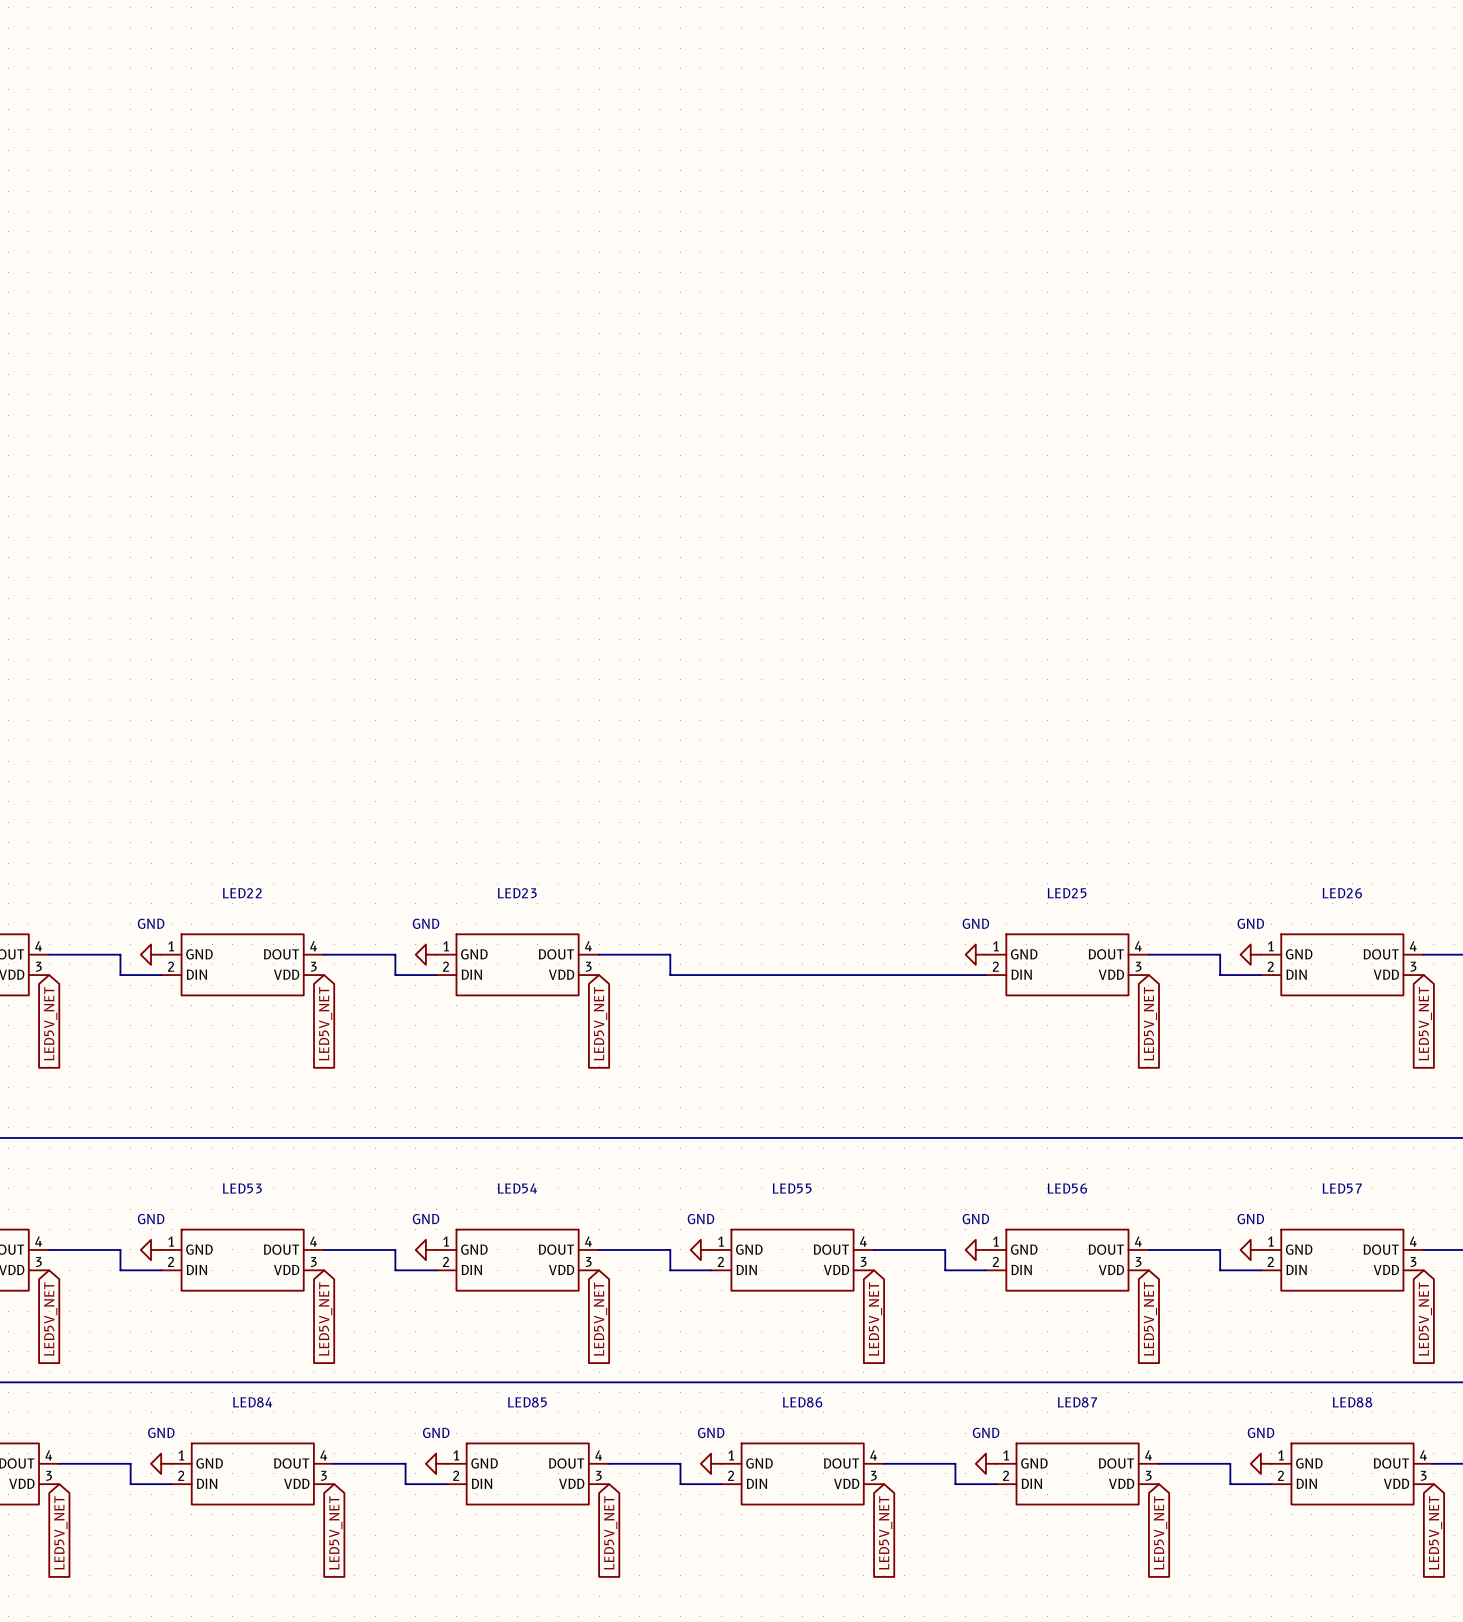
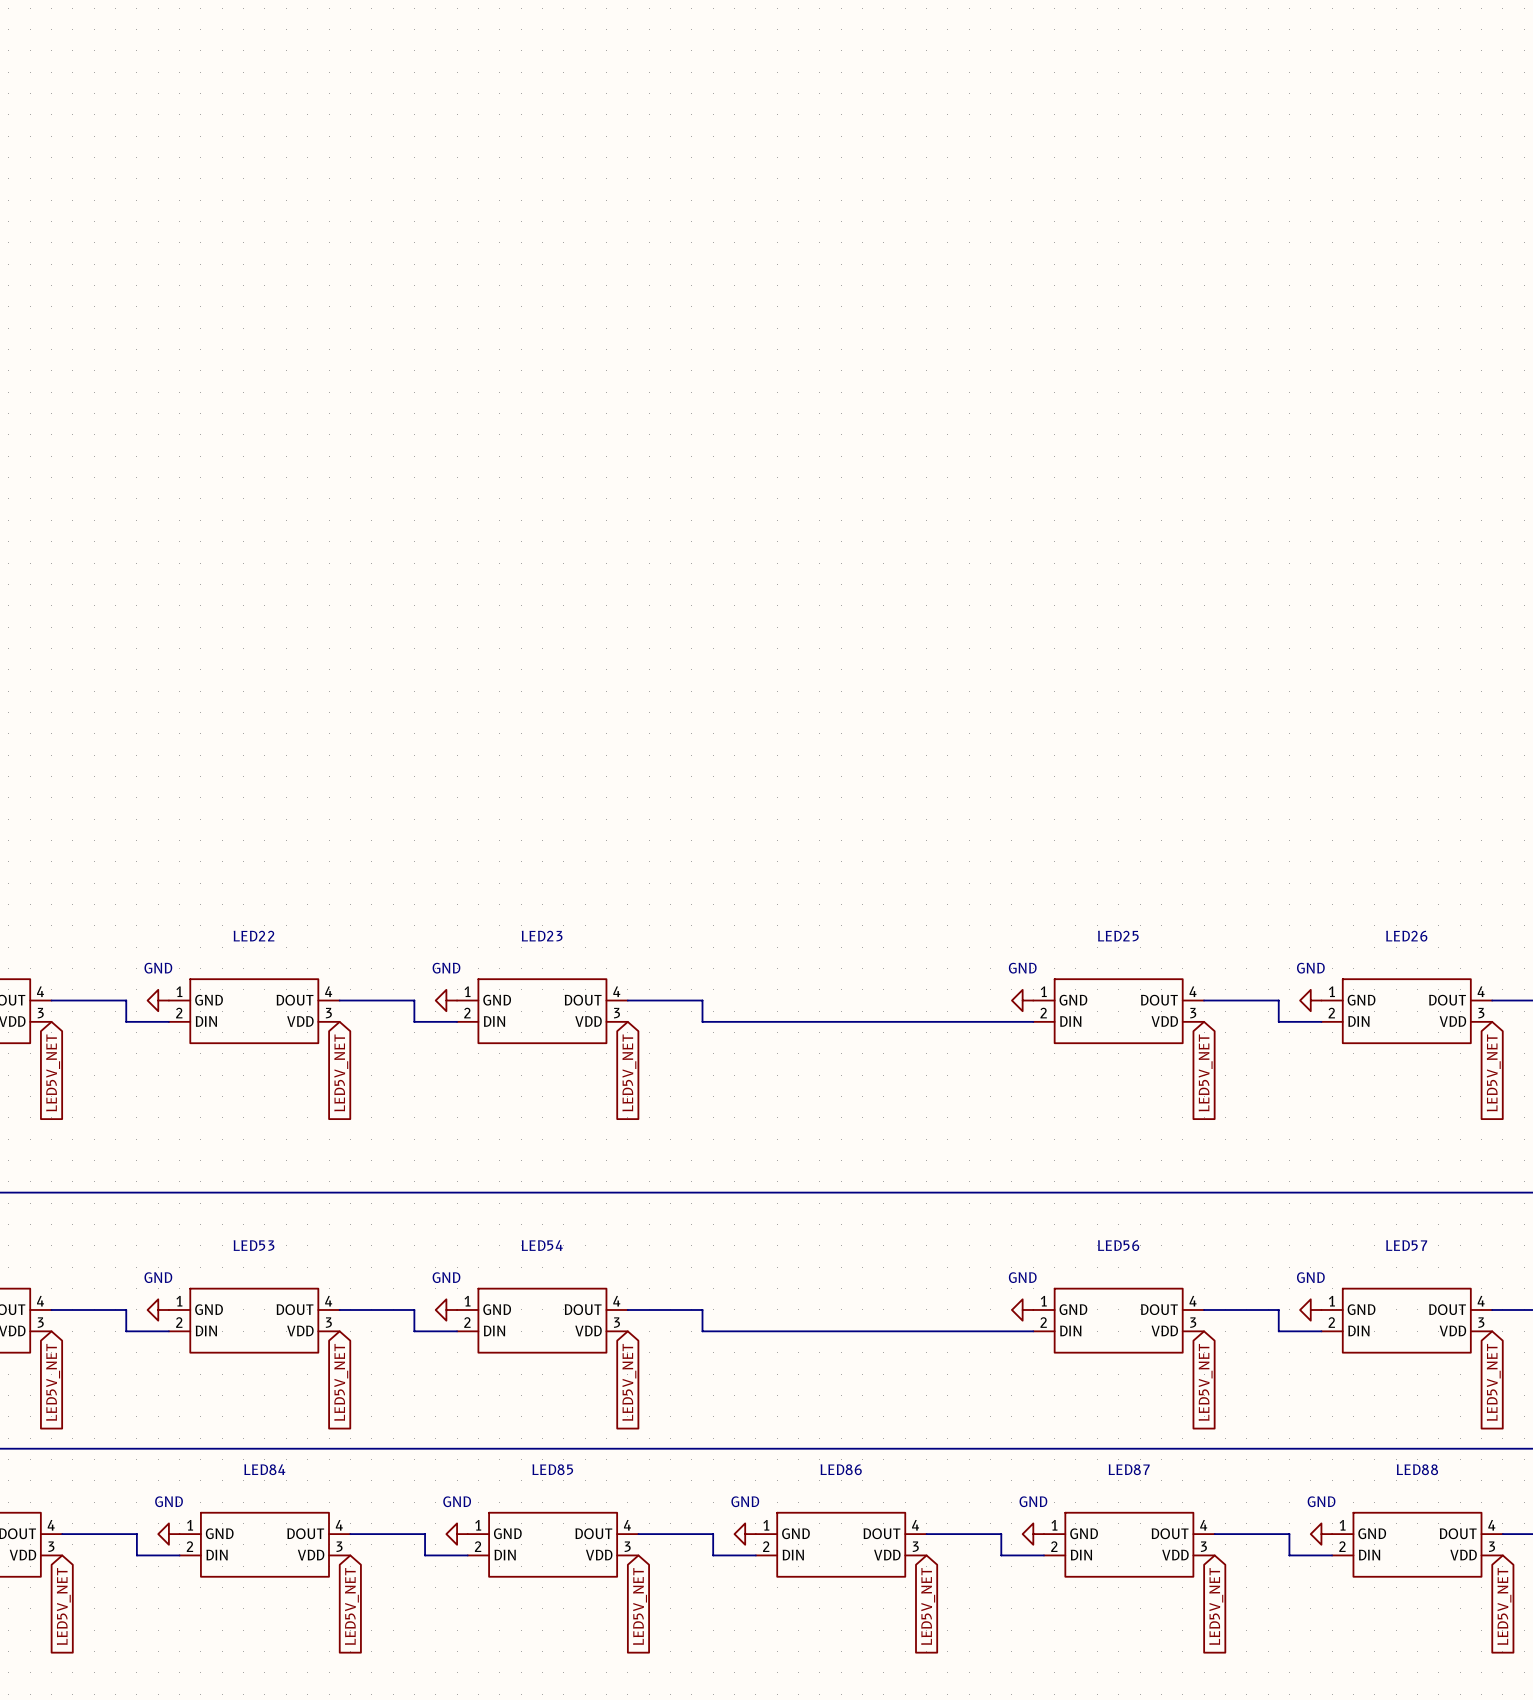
power symbol: GND (700, 1249) -> none
wire: (873, 1249) (945, 1249) (945, 1270) -> (745, 1331) (990, 1331)
LED55: (792, 1260) -> none
global label: LED5V_NET (875, 1319) -> none

